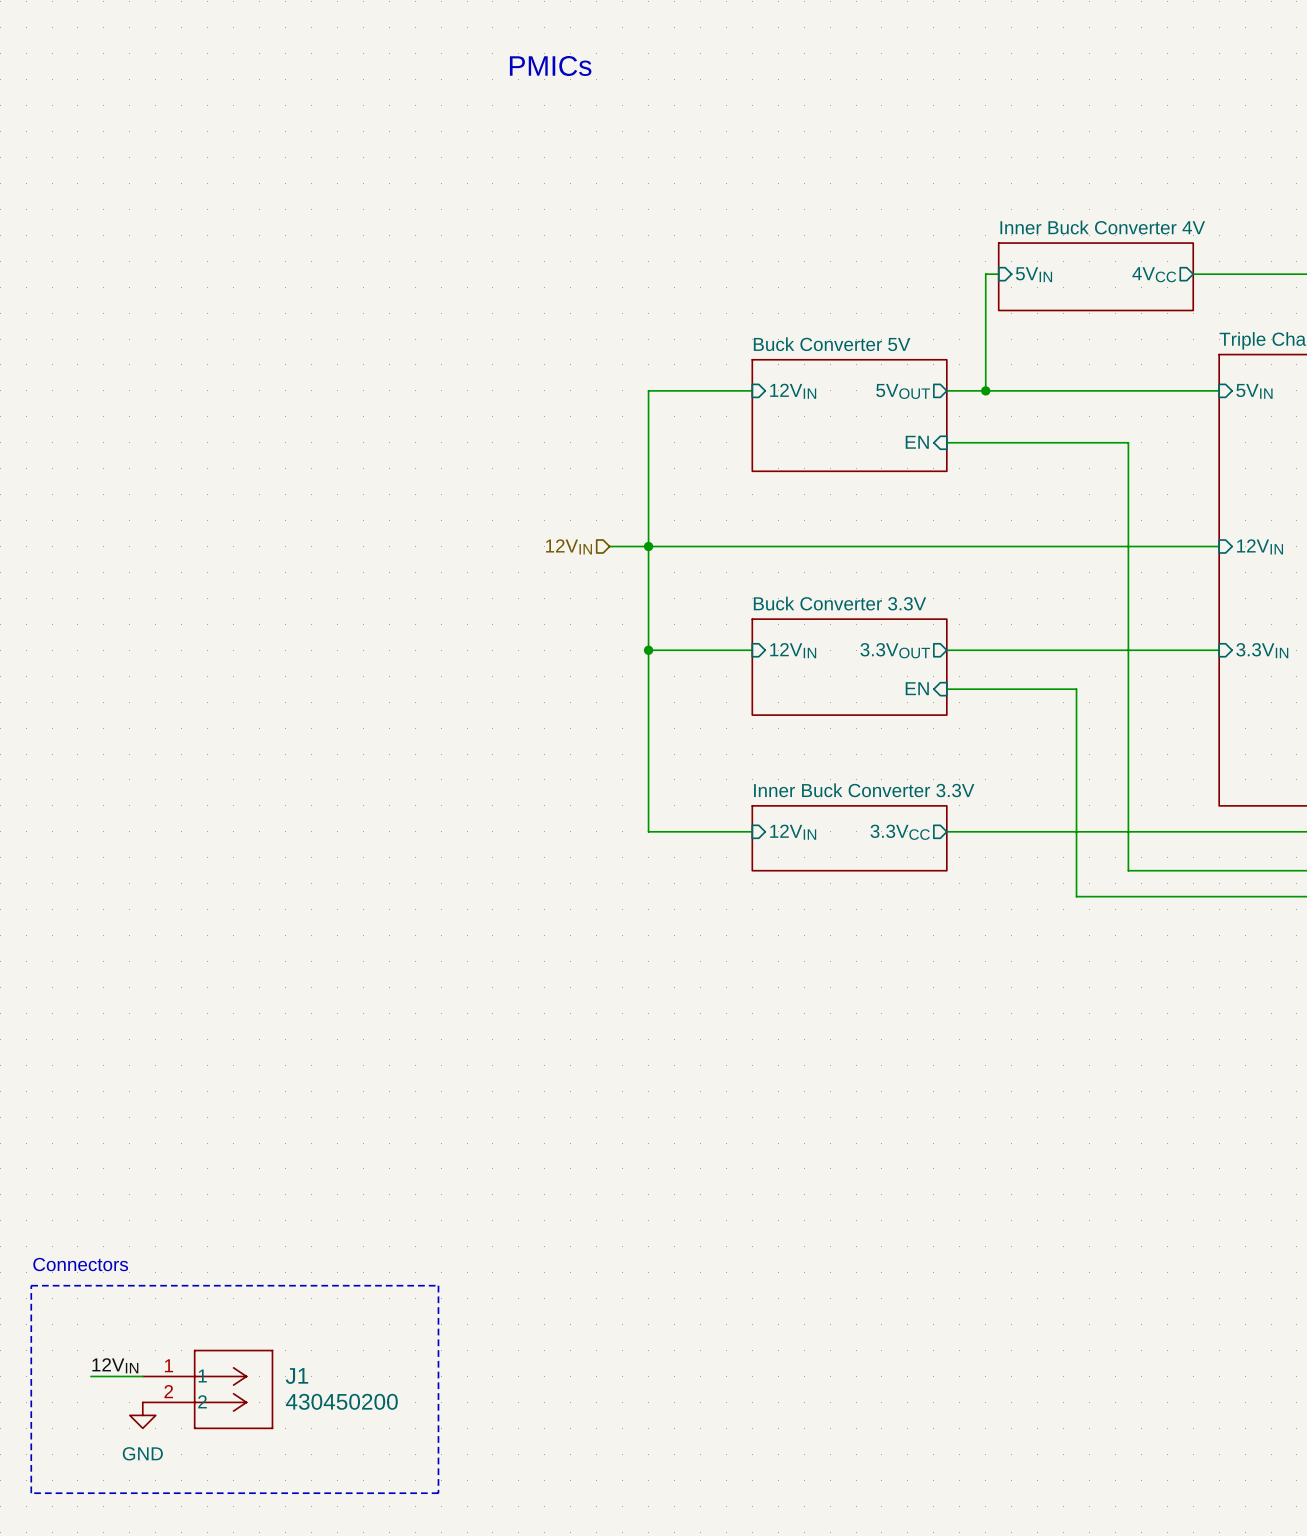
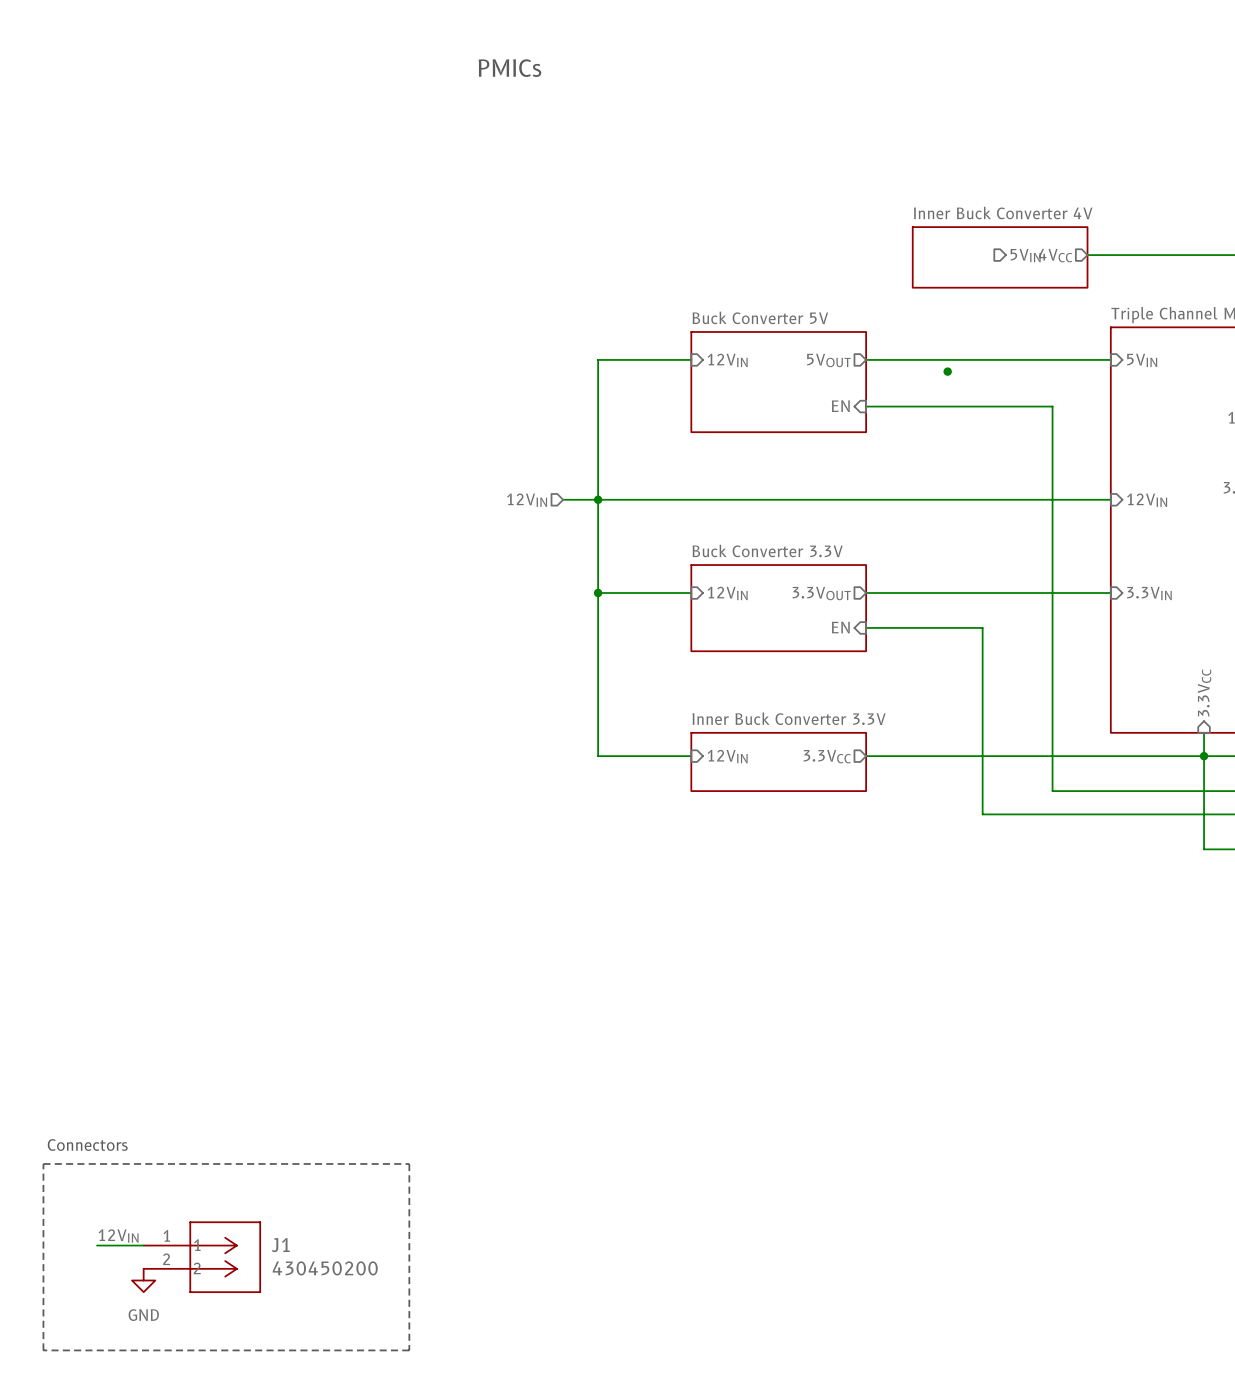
wire: (998, 274) (985, 274) (985, 390) -> none
sheet pin position: 5VIN (1034, 274) -> 5VIN (1025, 255)
junction position: (985, 390) -> (947, 371)
wire: (1128, 442) (1128, 870) (1154, 870) -> (1029, 406) (1052, 406) (1052, 791)

